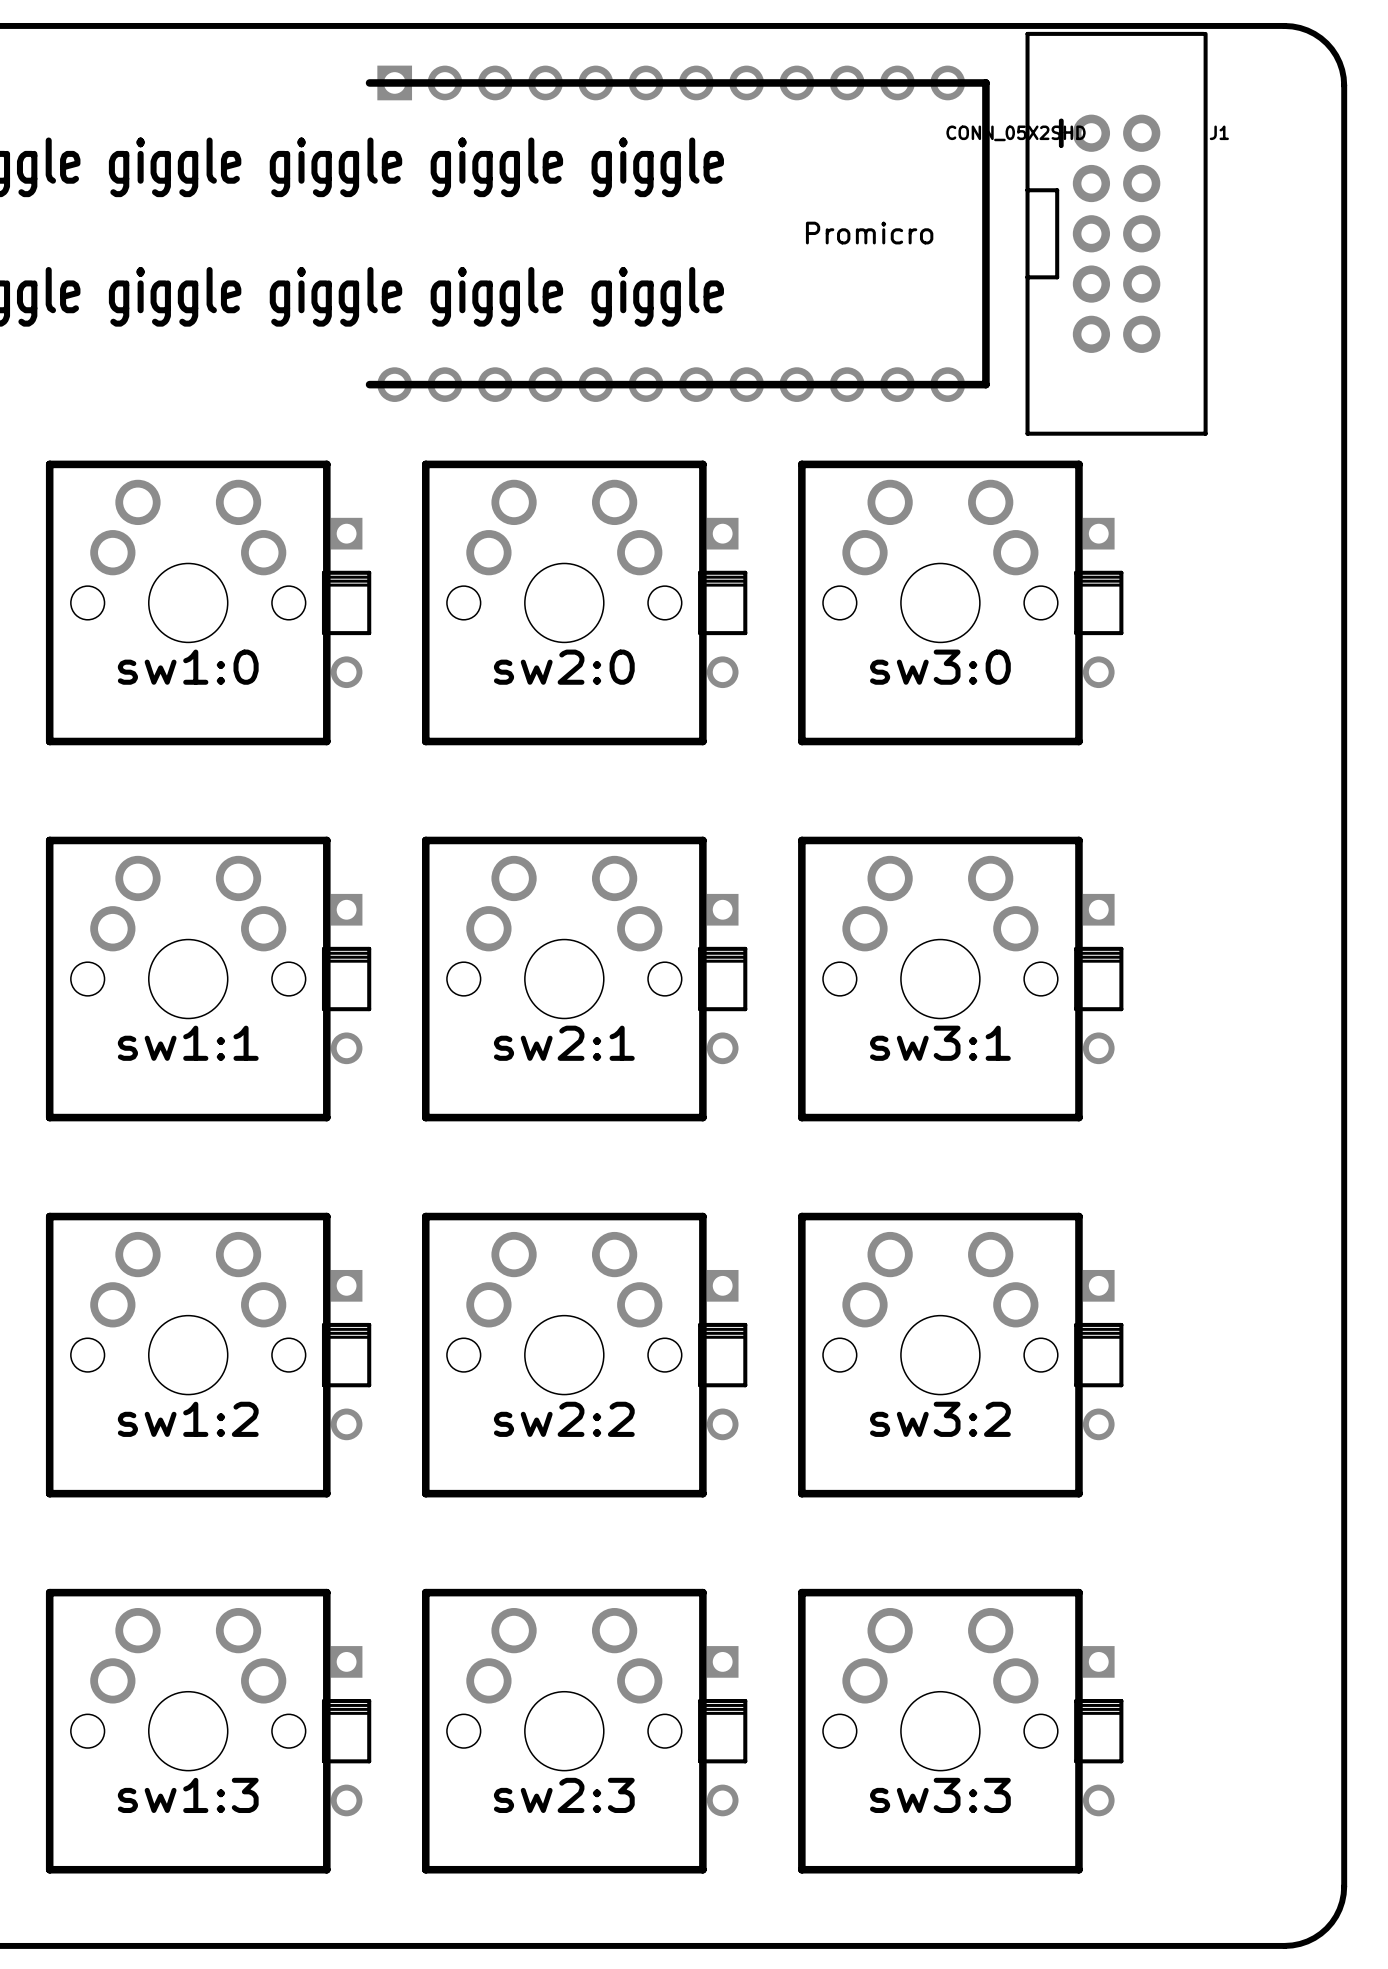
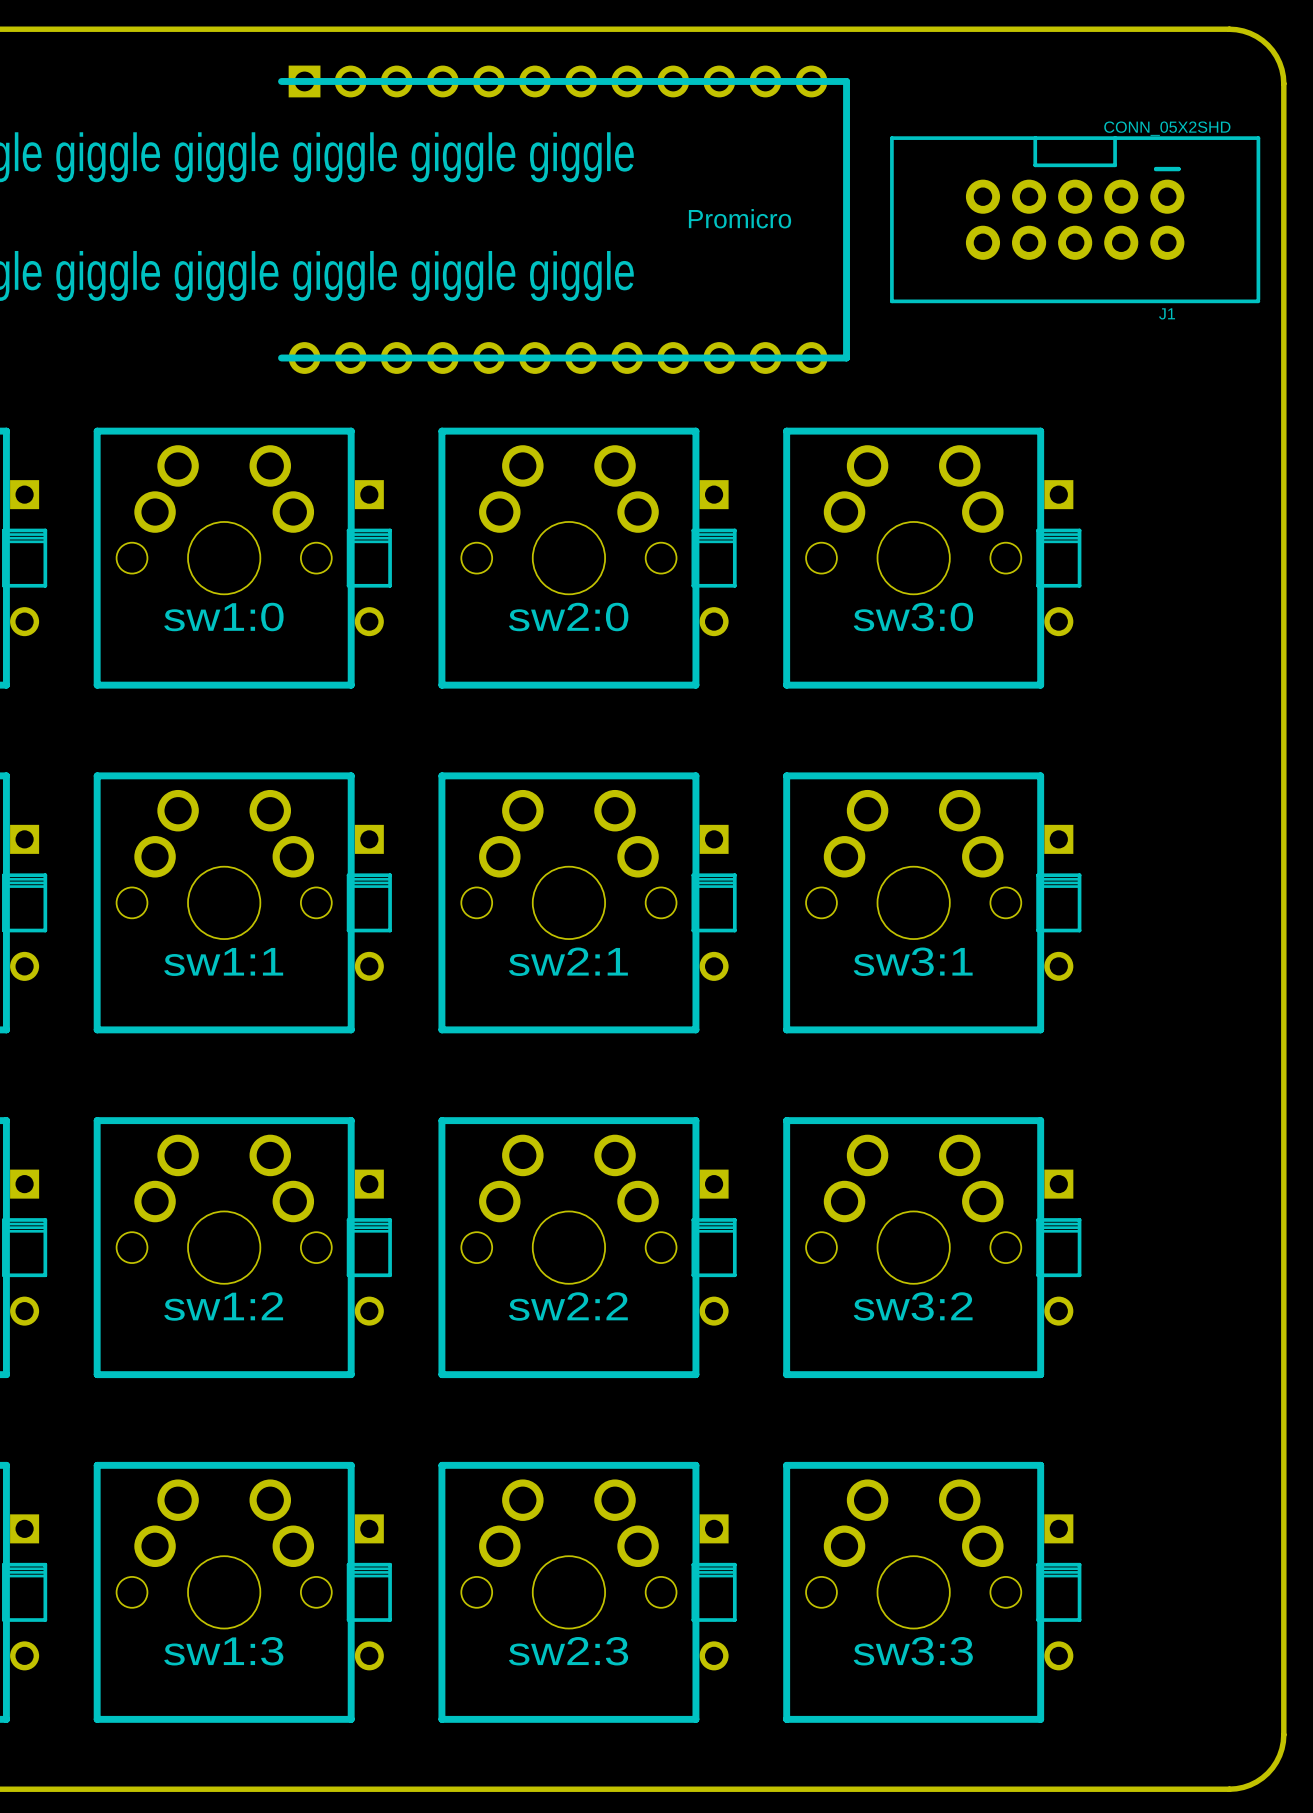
Promicro position: (677, 233) -> (564, 219)
J1 rotation: 0° (1116, 233) -> 90° clockwise (1075, 219)

